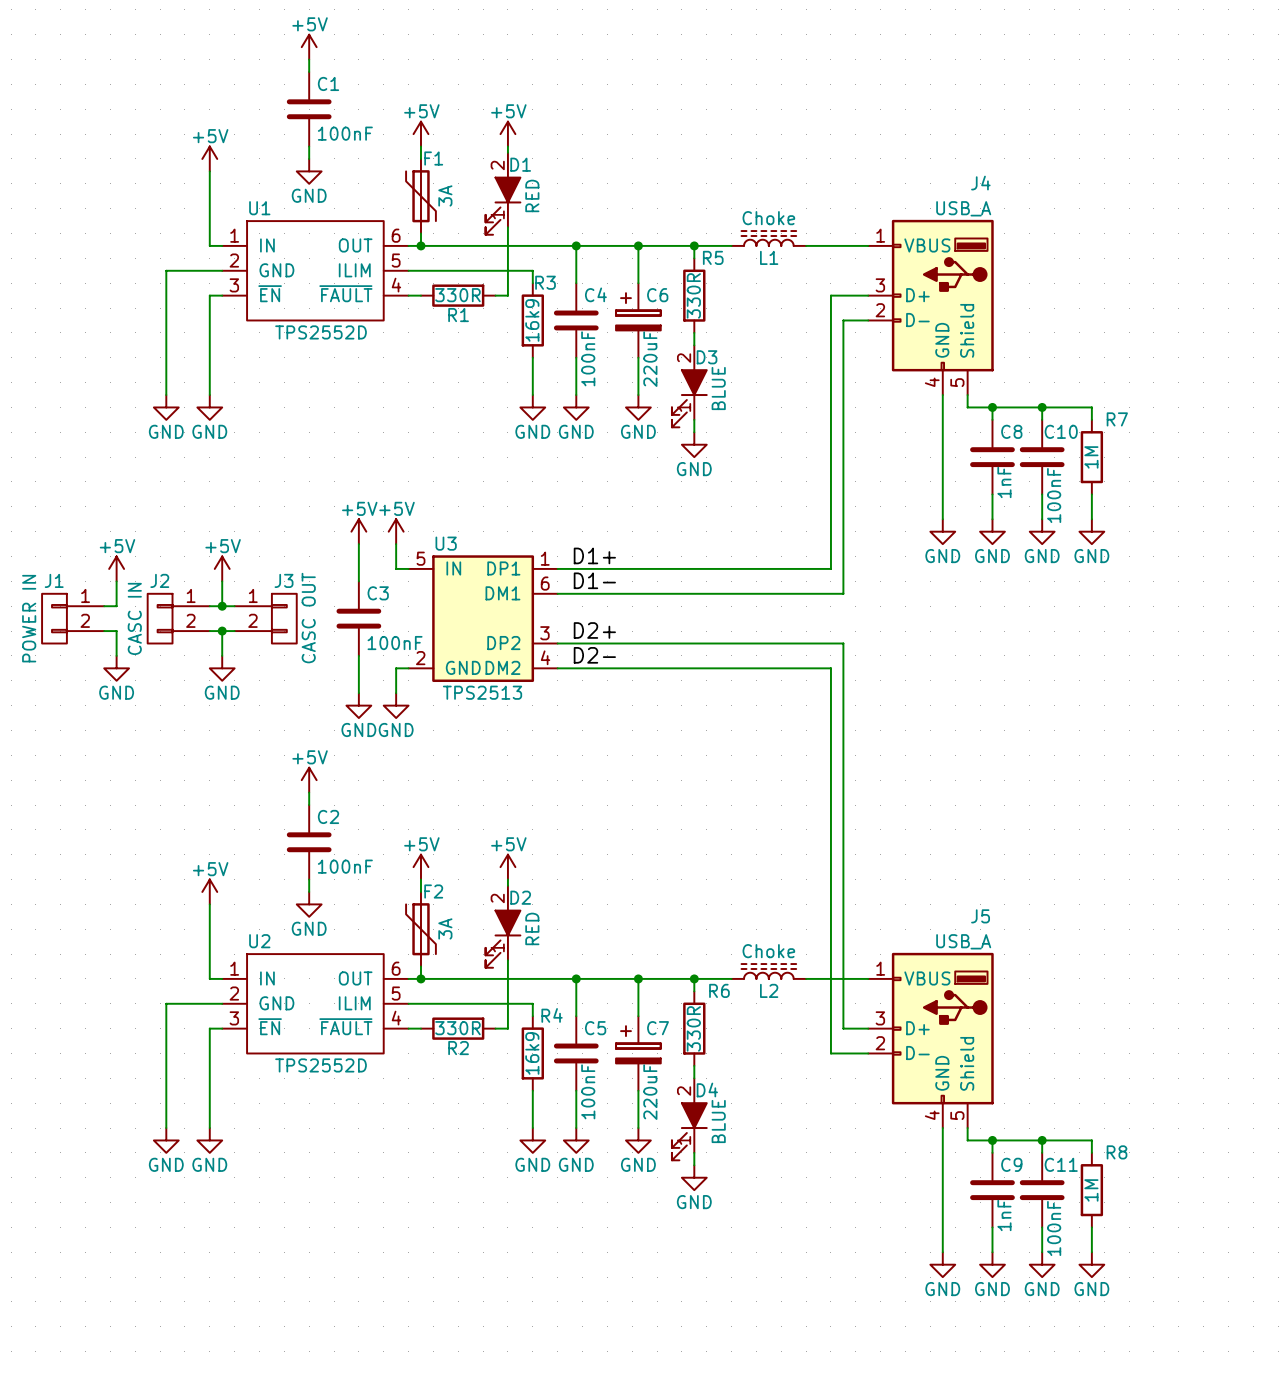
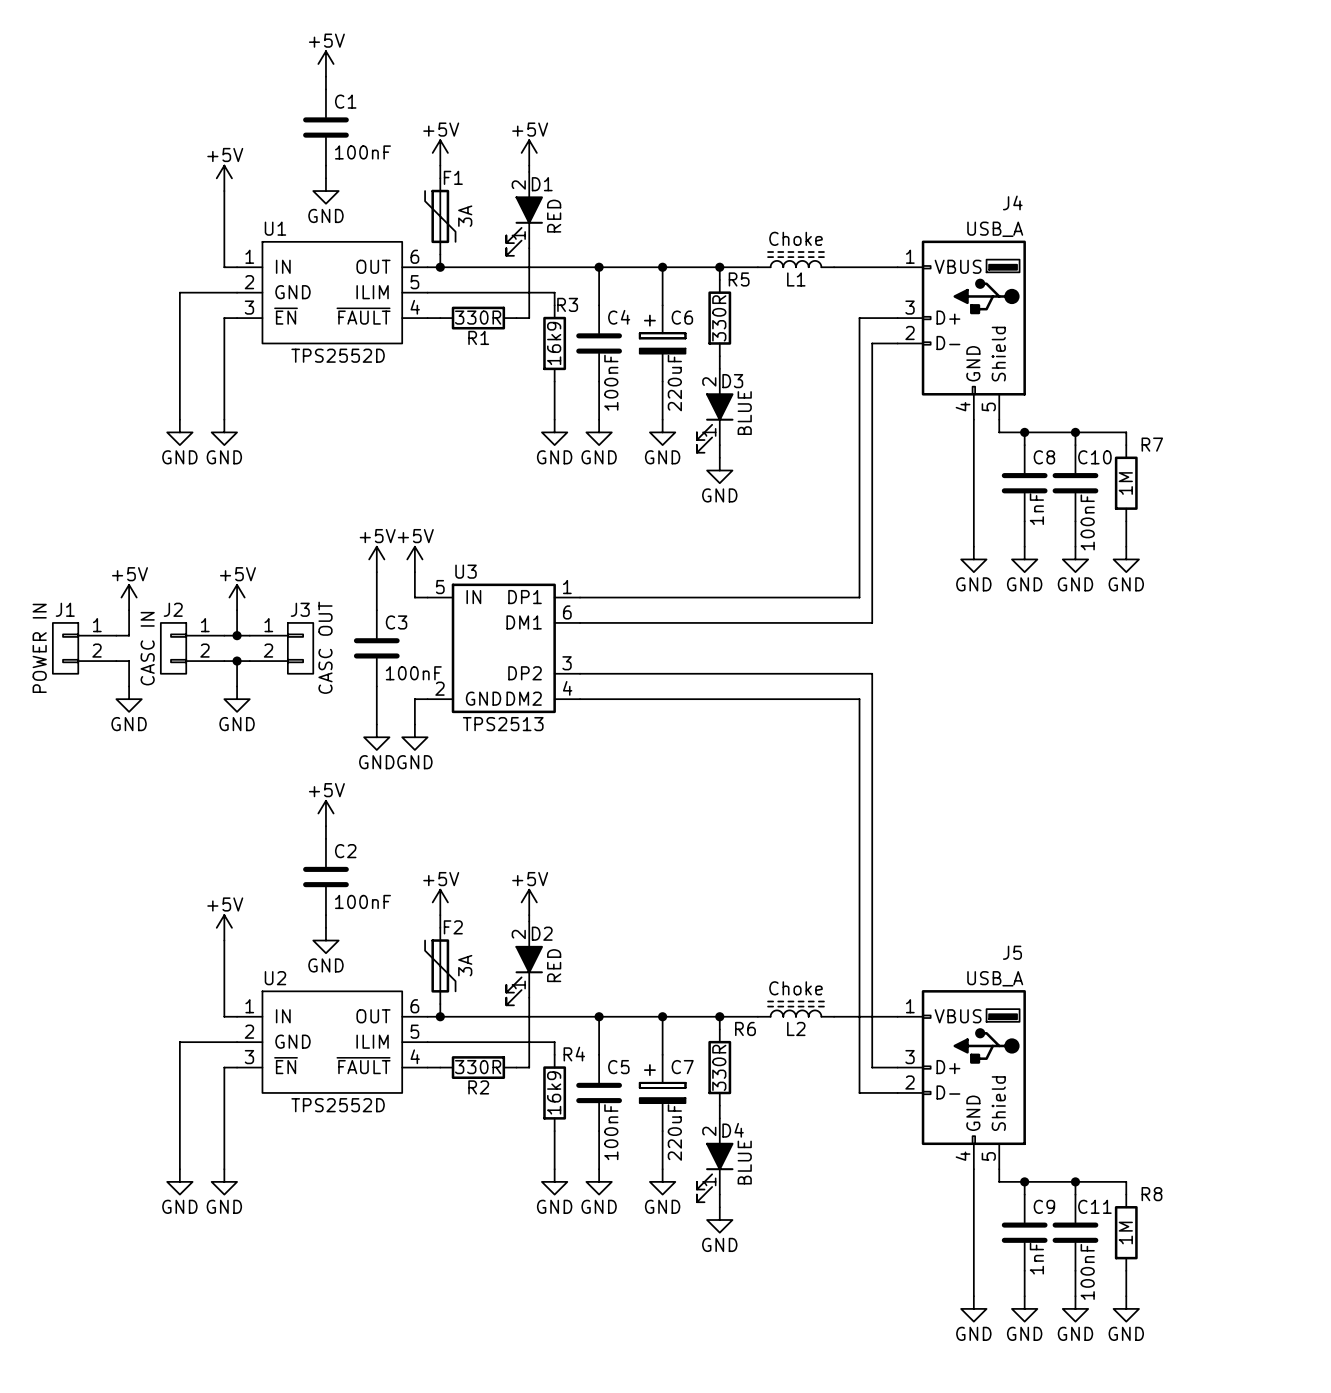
label: D1+ (594, 555) -> none
label: D1- (594, 580) -> none
label: D2+ (594, 630) -> none
label: D2- (594, 655) -> none

